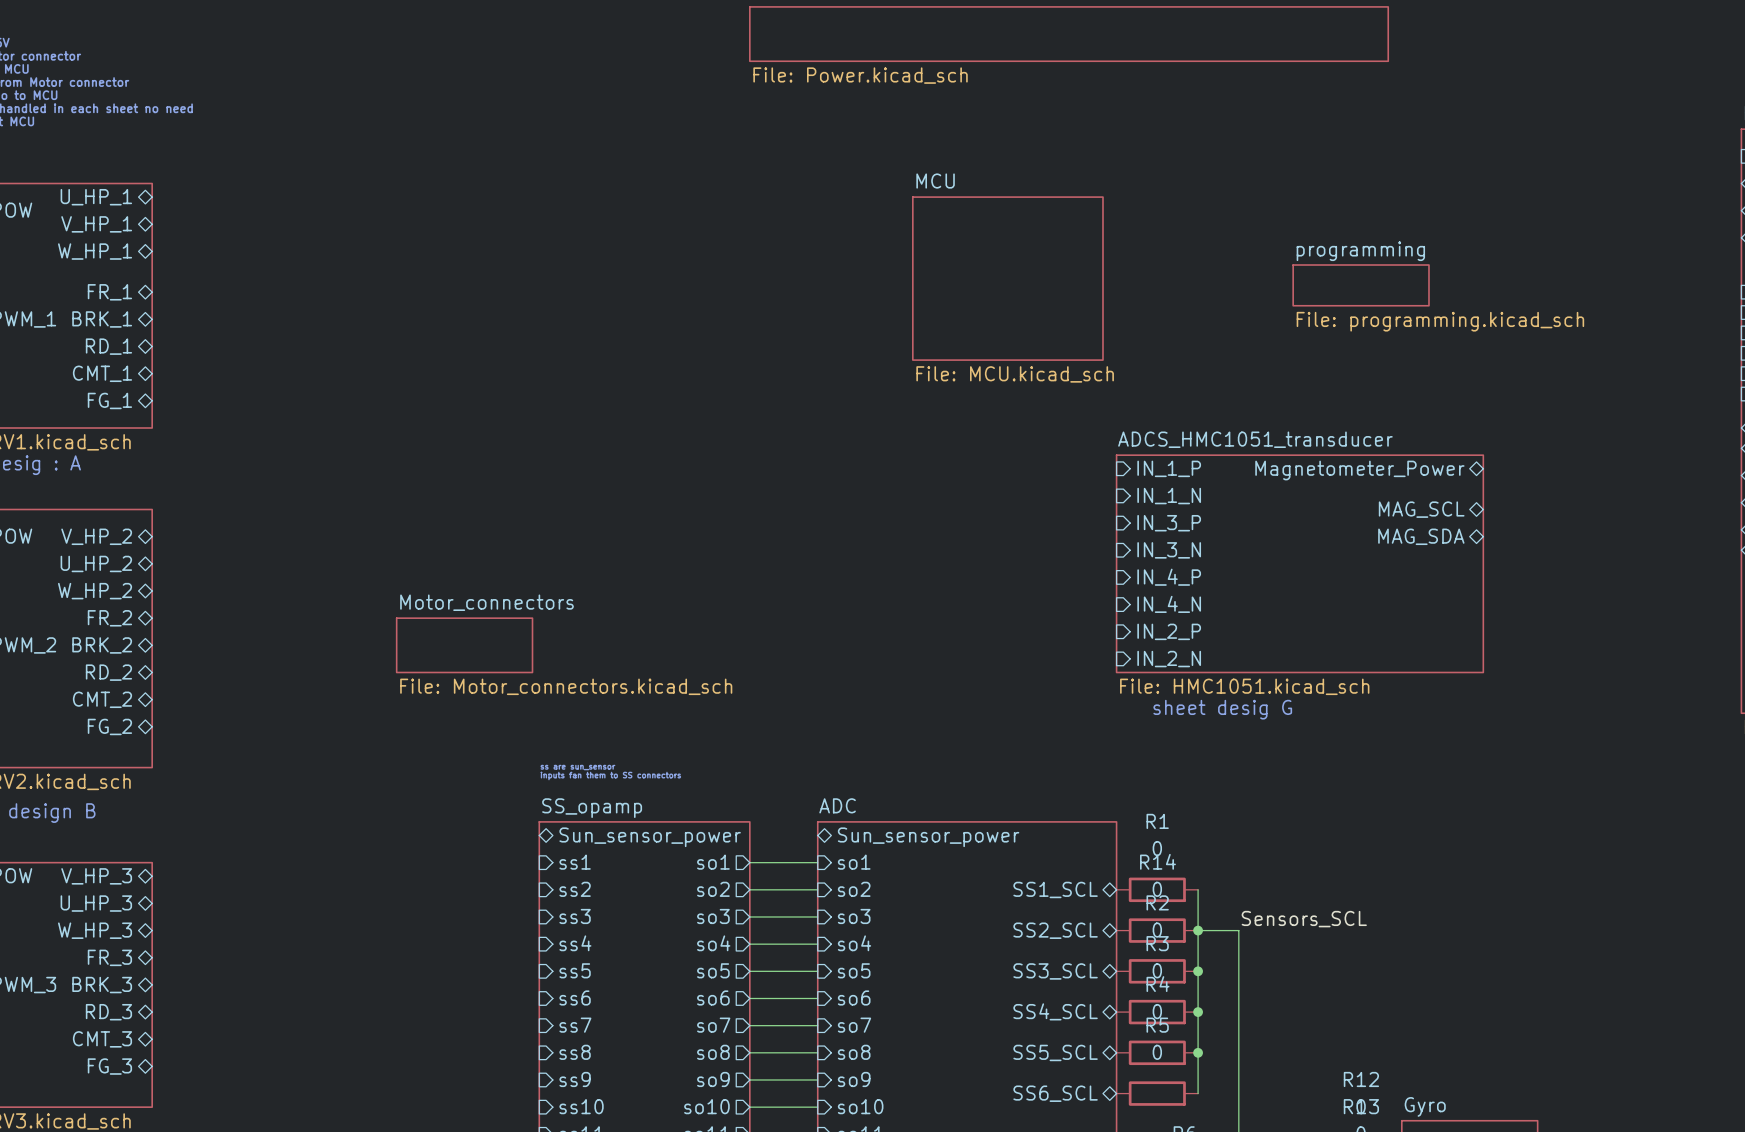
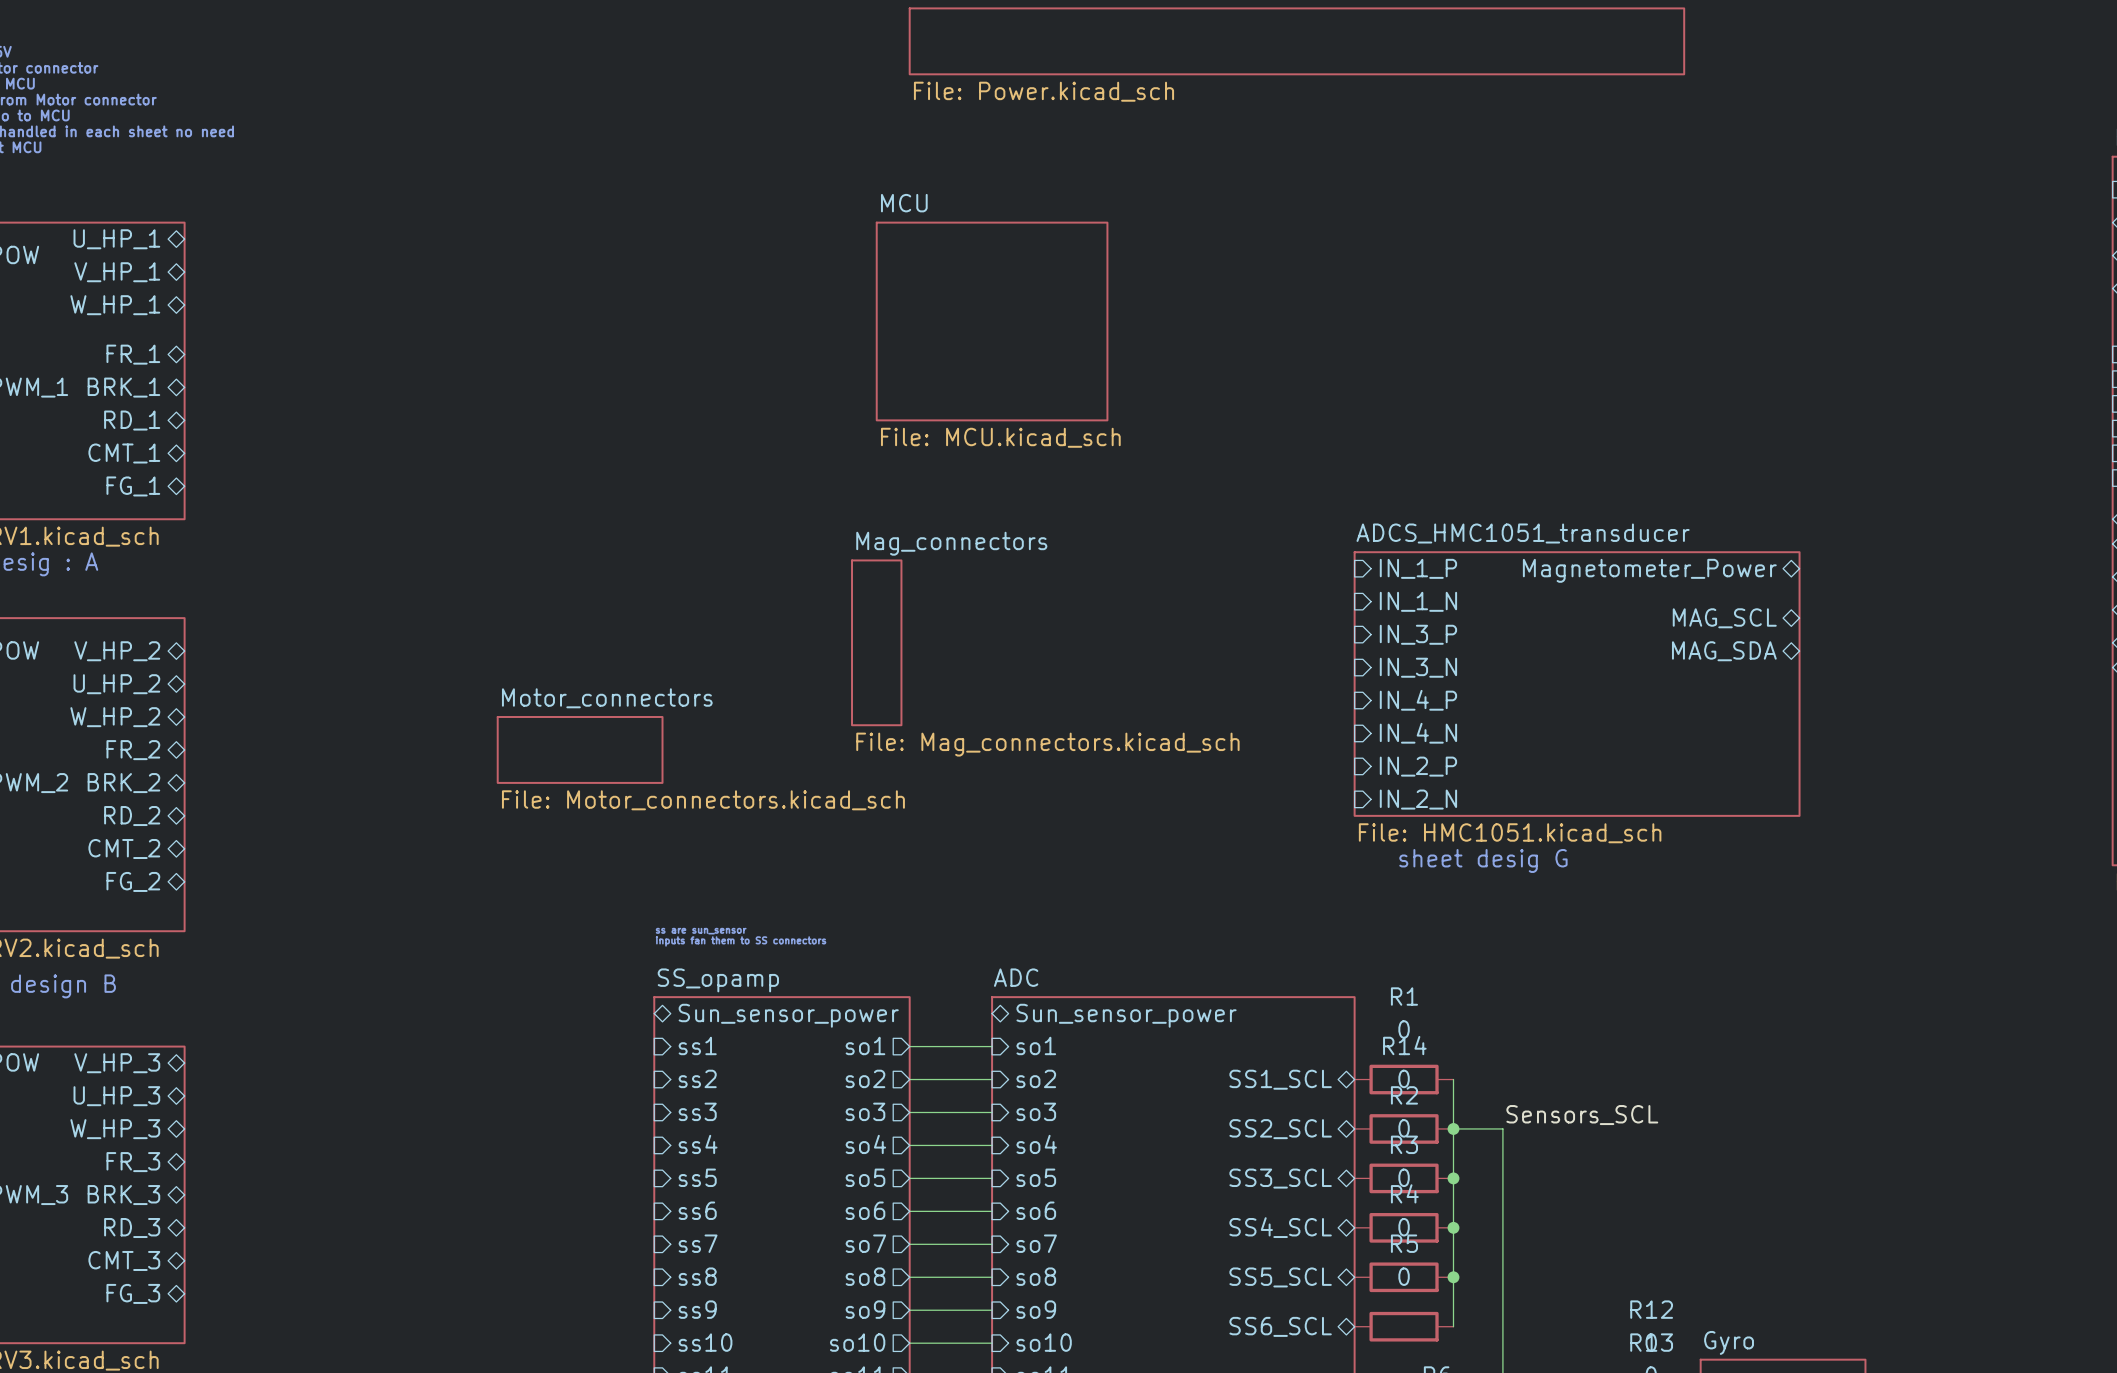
sheet MCU position: (1007, 278) -> (992, 321)
sheet programming: File: programming.kicad_sch (1361, 285) -> none
sheet Mag_connectors: none -> File: Mag_connectors.kicad_sch (876, 642)
sheet Motor_connectors position: (464, 645) -> (580, 749)

